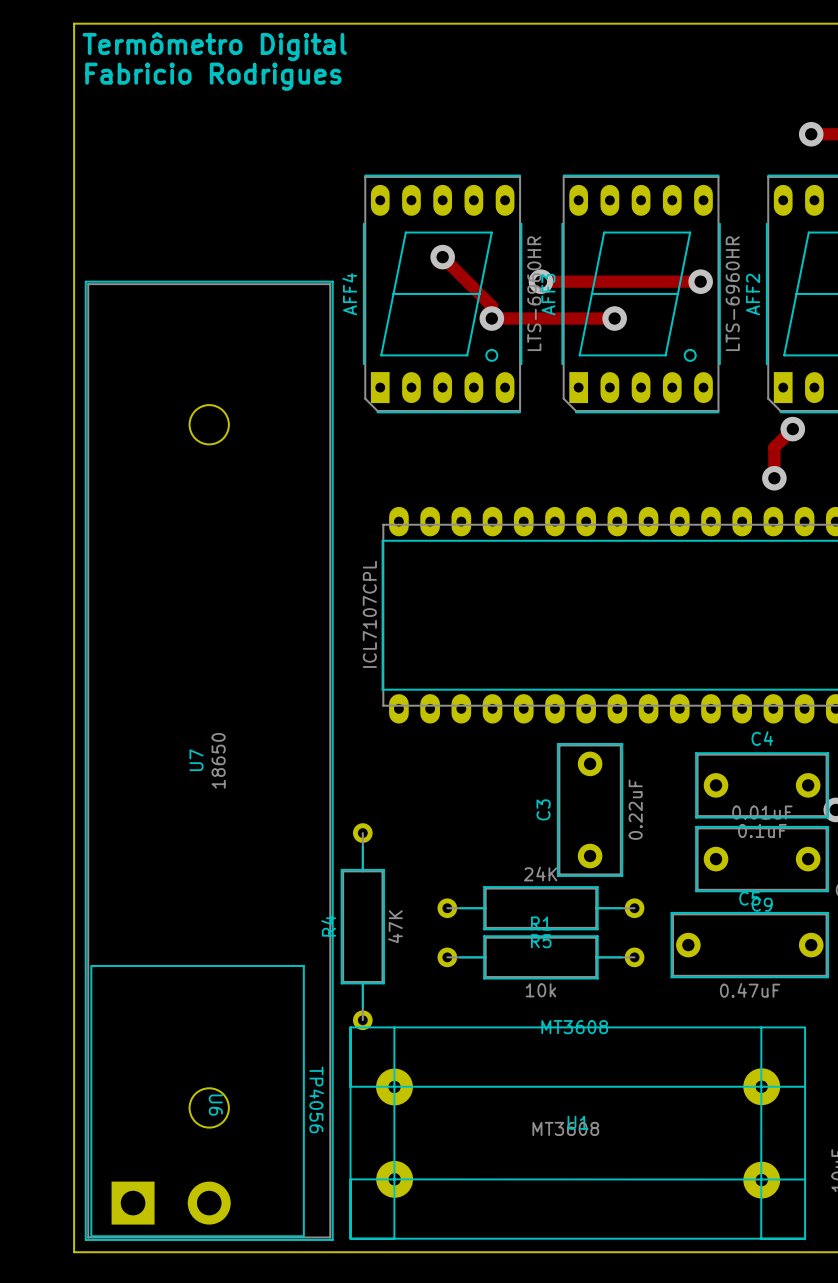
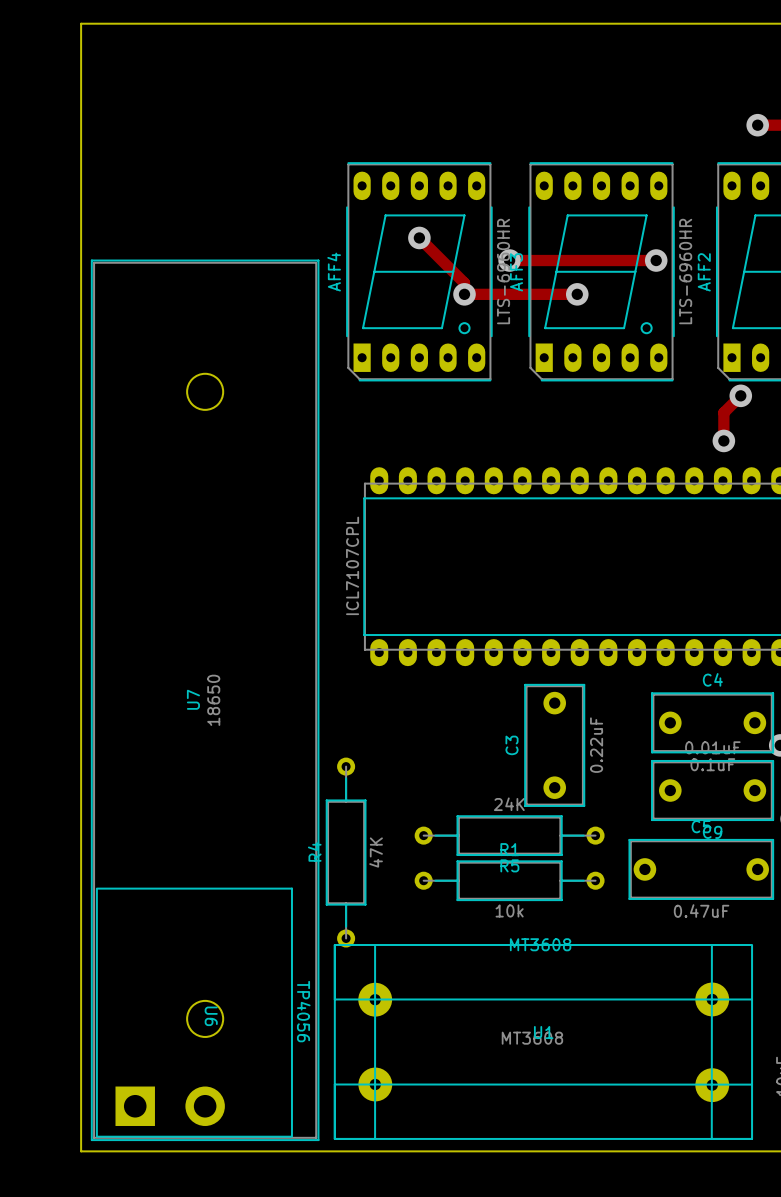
text: Termômetro Digital (214, 46) -> none
text: Fabricio Rodrigues (213, 76) -> none

